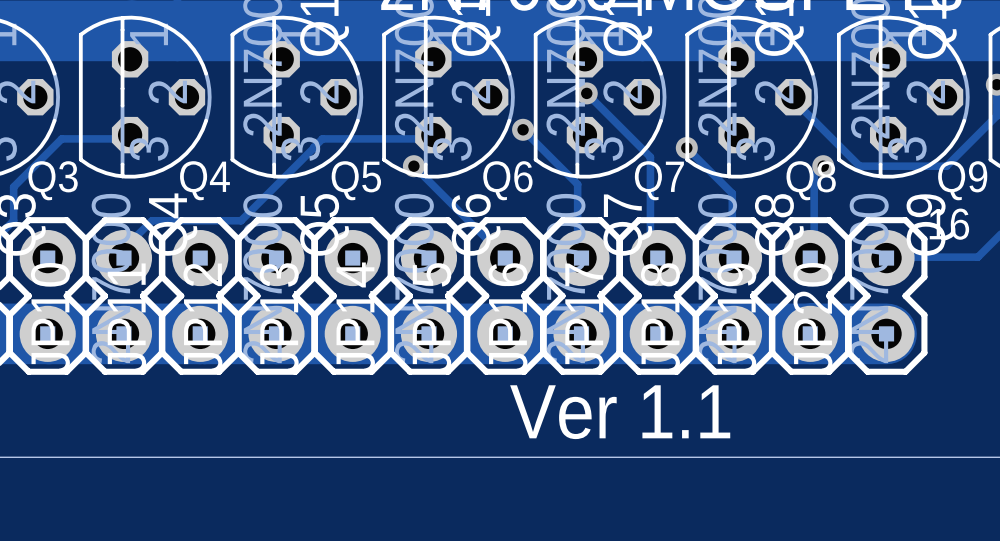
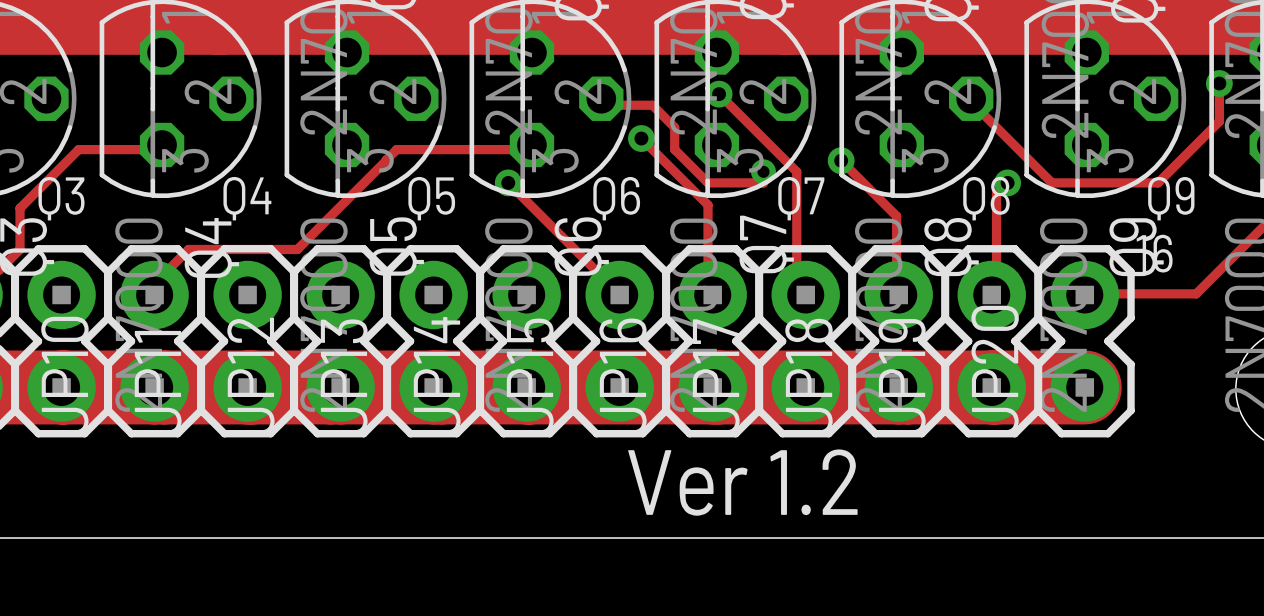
track: none -> (601, 98) (608, 105) (652, 105) (674, 127) (674, 149) (708, 182) (763, 182) (763, 171)
via: none -> (763, 171)
text: Ver 1.1 (620, 412) -> Ver 1.2 (742, 482)

